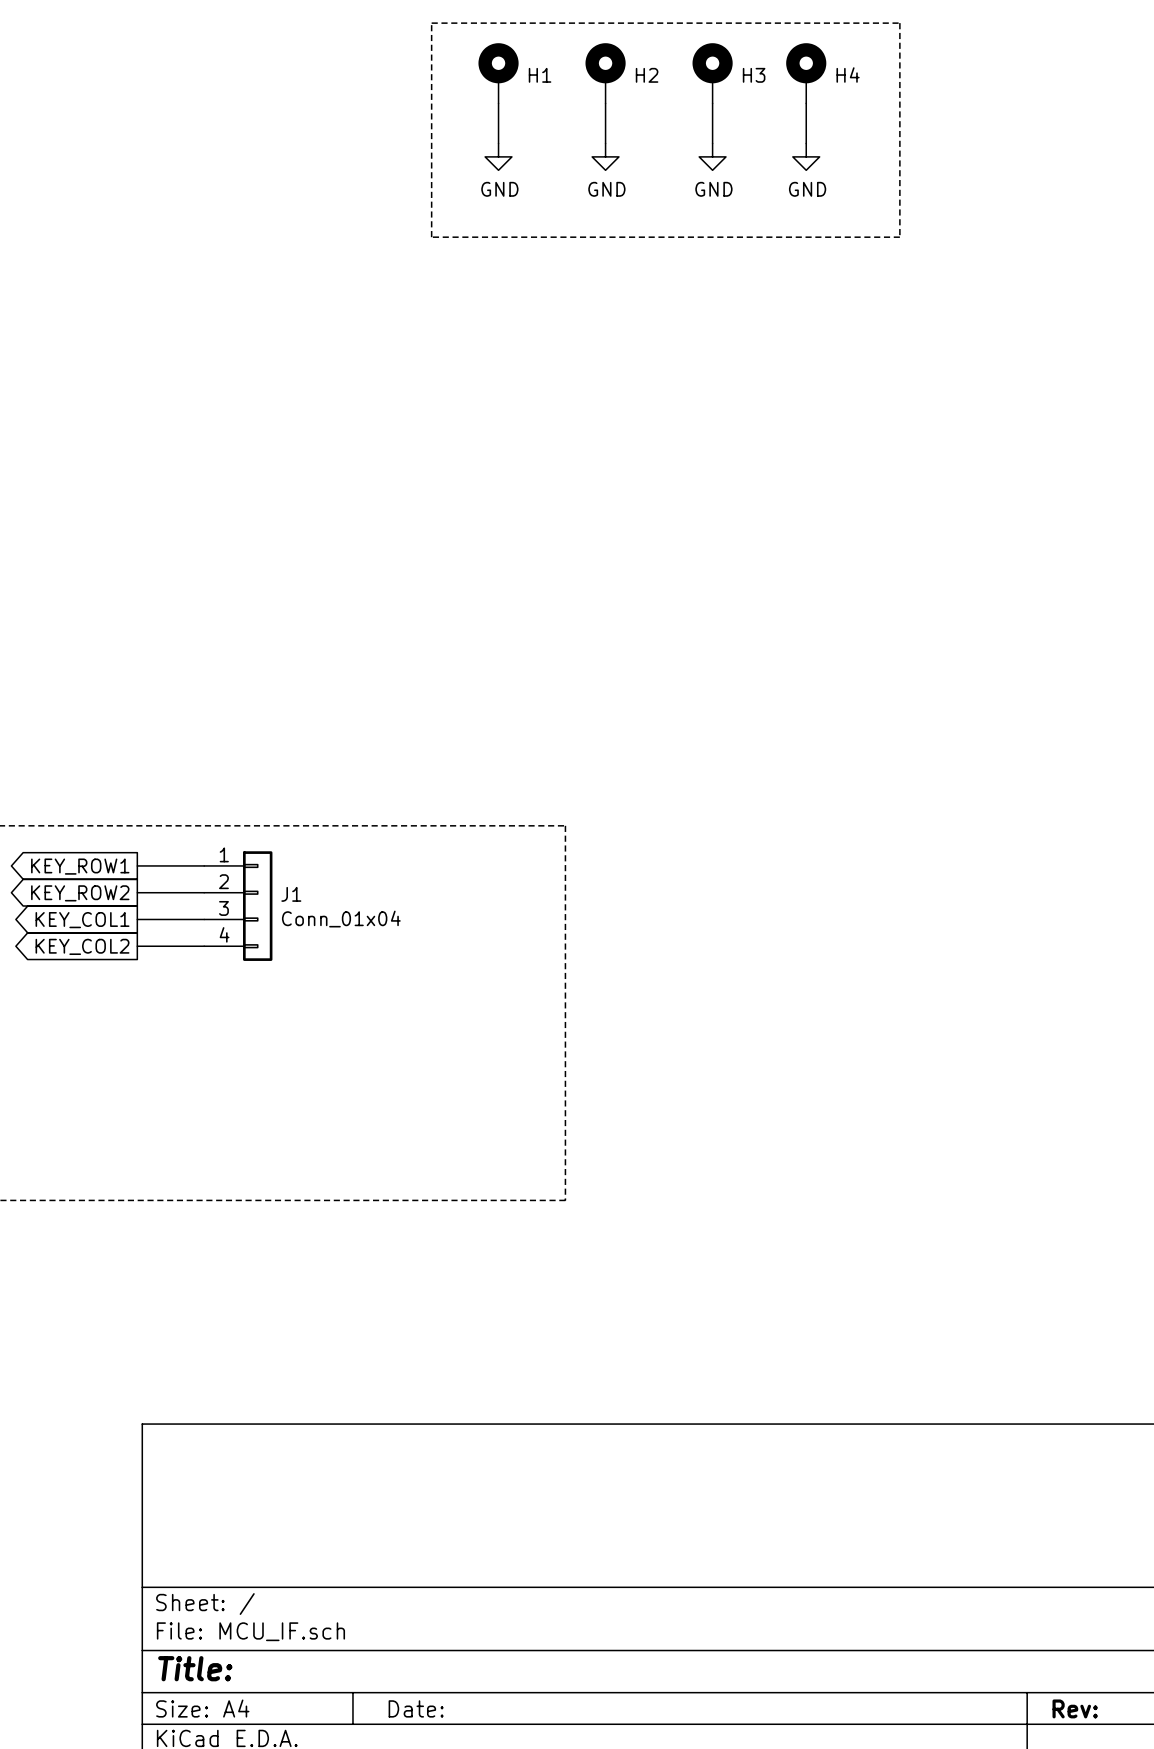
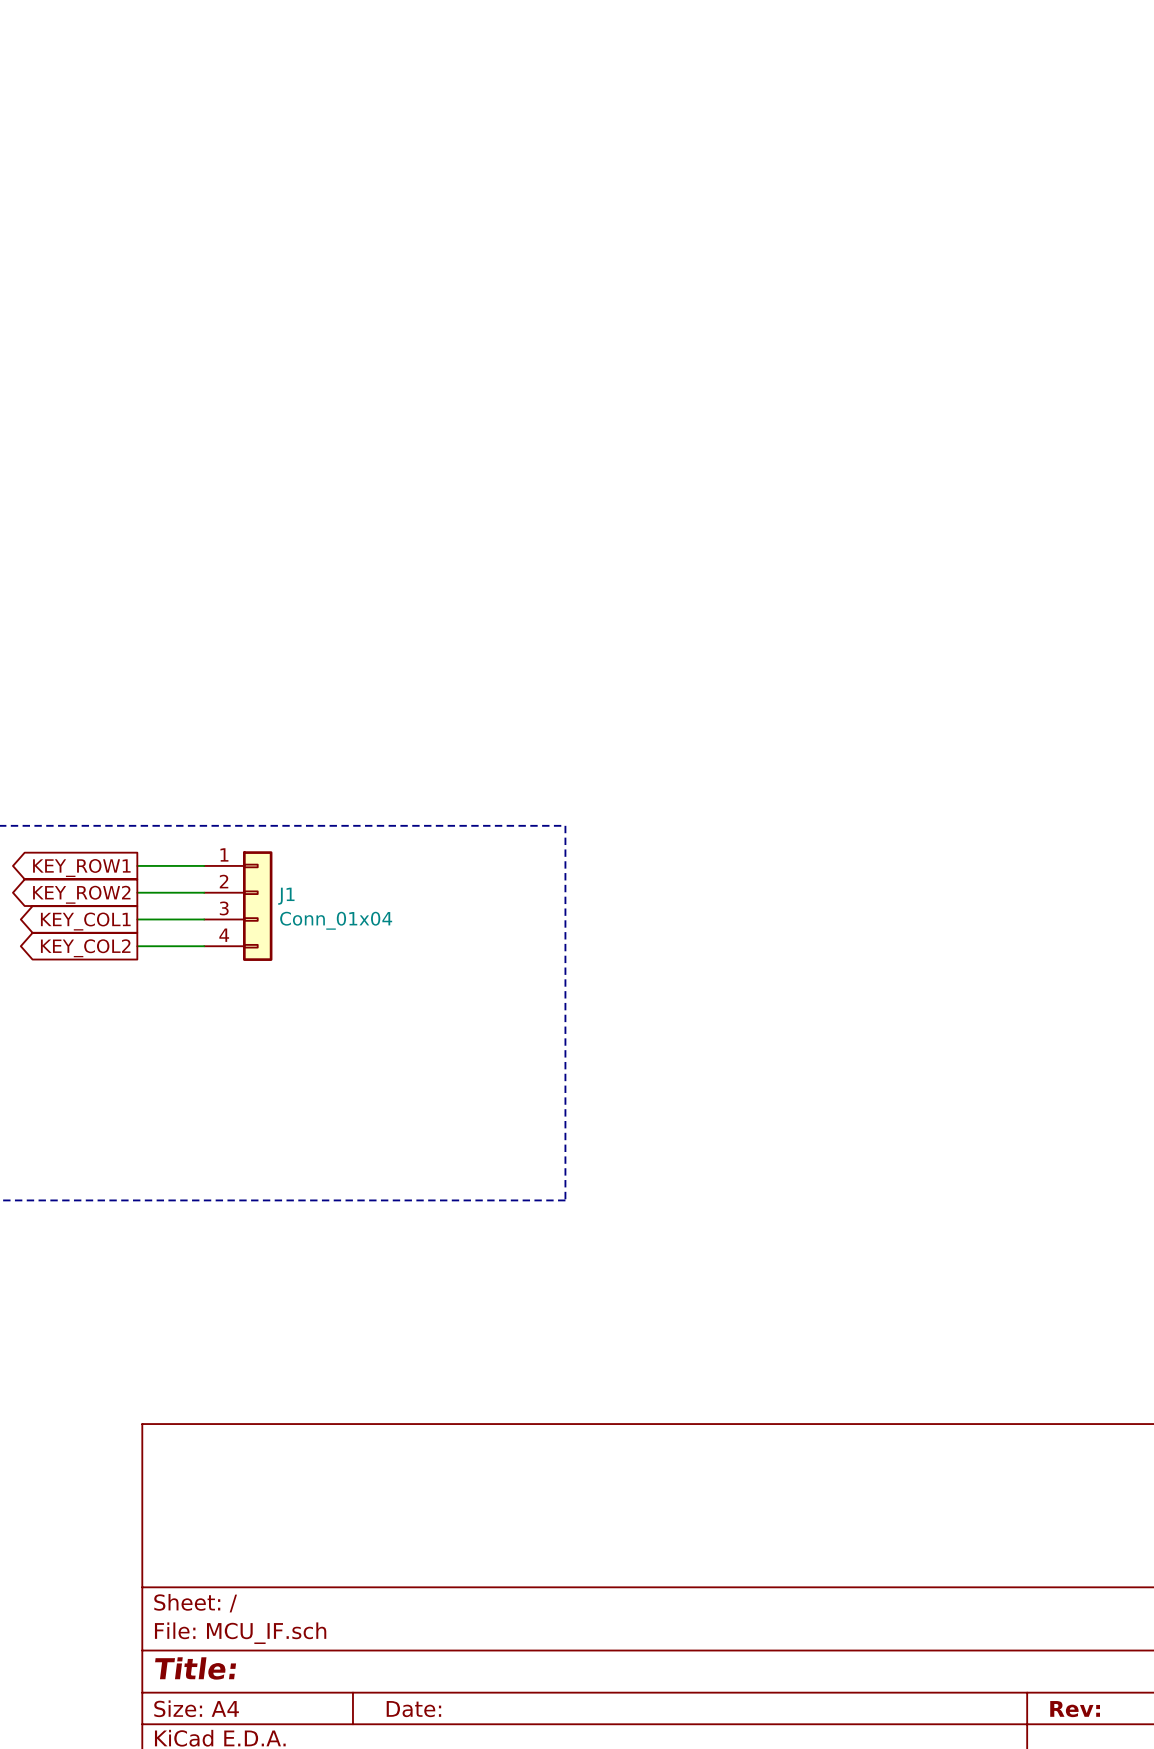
line: (431, 23) (431, 237) (899, 237) (899, 23) (431, 23) -> none
H1: (498, 73) -> none
H2: (605, 73) -> none
H3: (712, 73) -> none
H4: (806, 73) -> none
wire: (498, 103) (498, 143) -> none
wire: (605, 103) (605, 143) -> none
wire: (712, 103) (712, 143) -> none
wire: (806, 103) (806, 143) -> none
power symbol: GND (498, 156) -> none
power symbol: GND (605, 156) -> none
power symbol: GND (712, 156) -> none
power symbol: GND (806, 156) -> none

